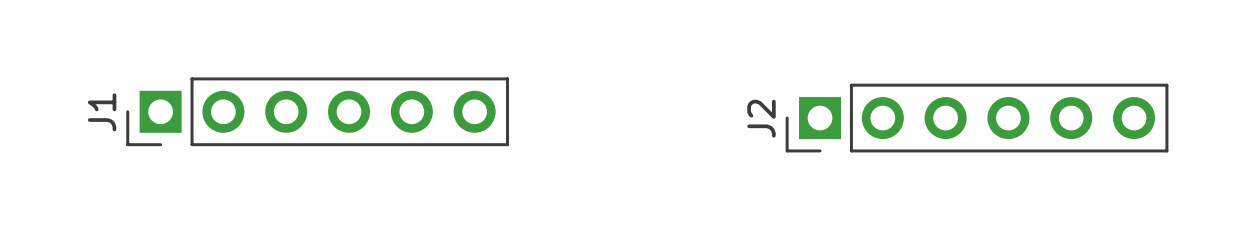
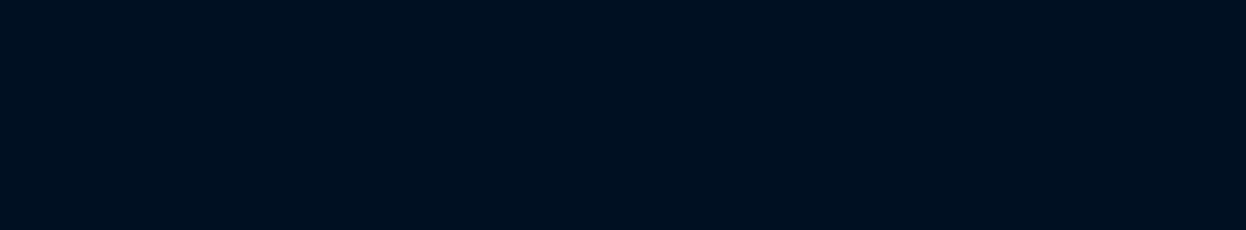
J1: (317, 111) -> none
J2: (977, 118) -> none

